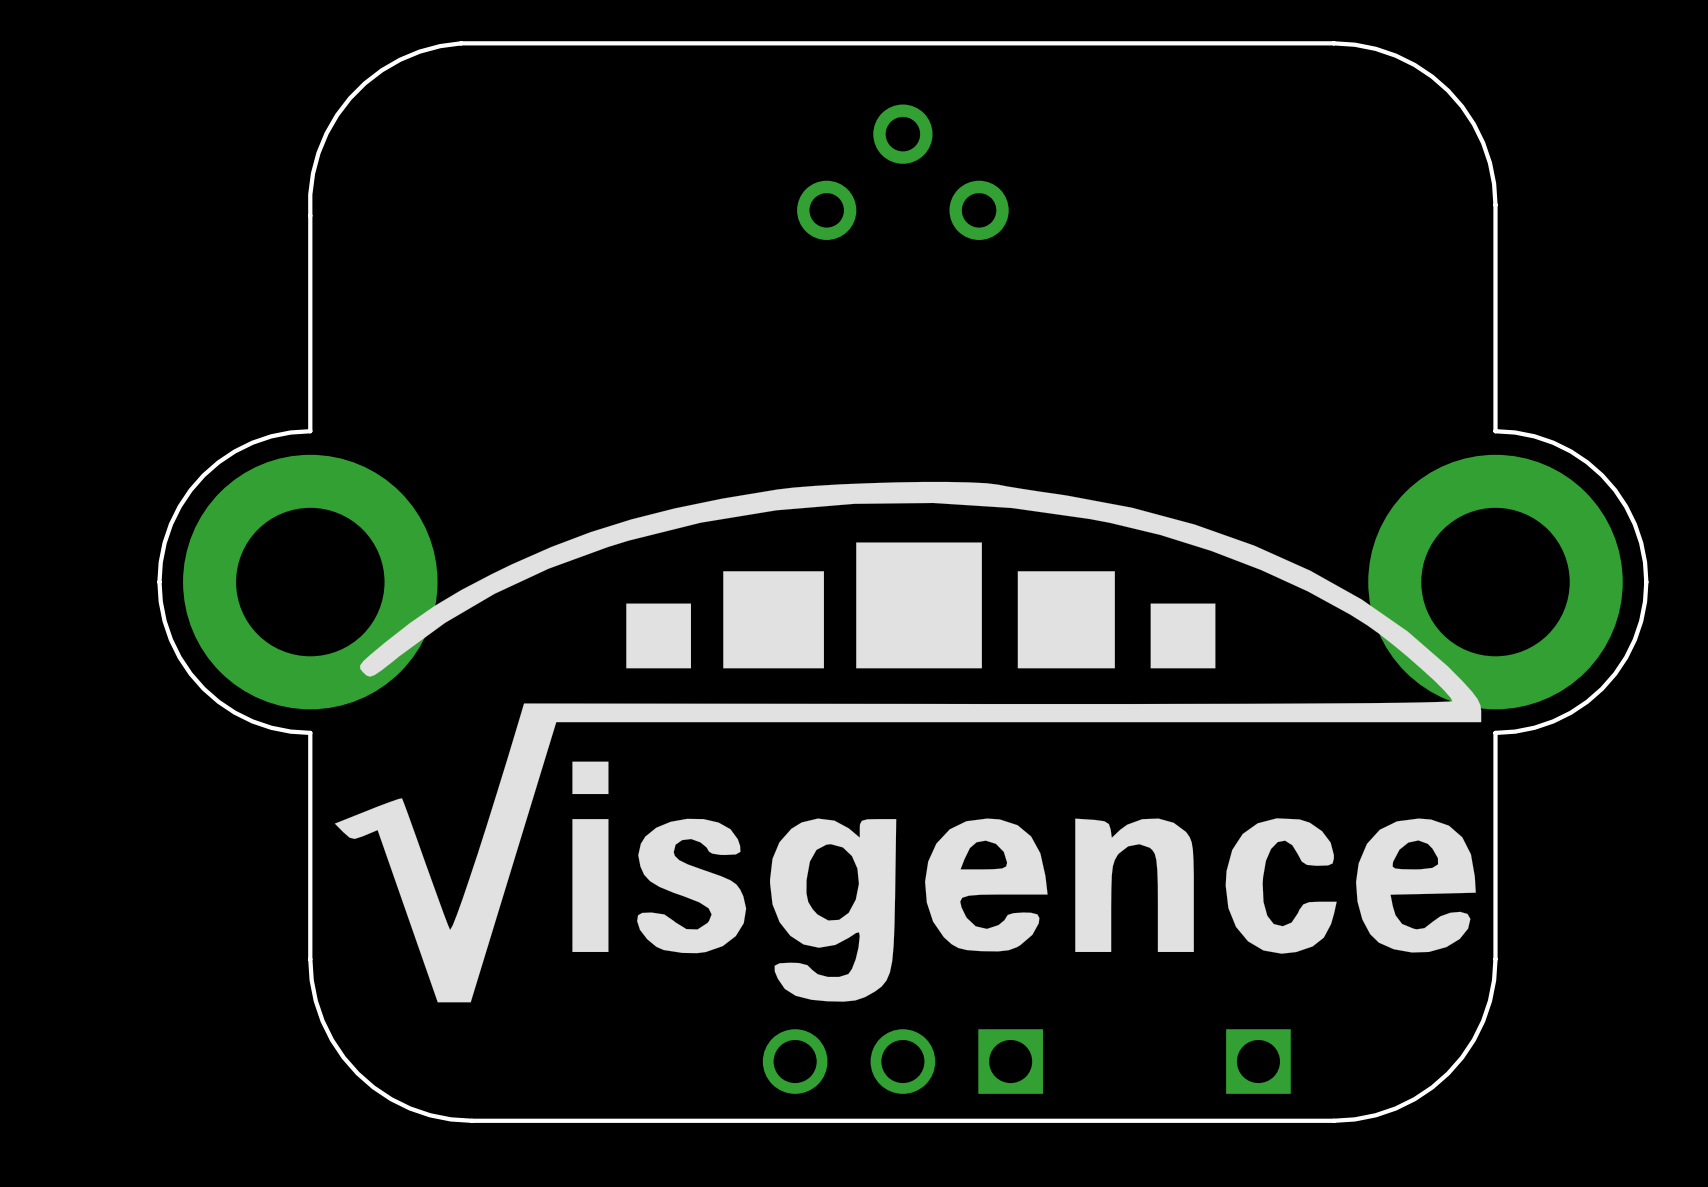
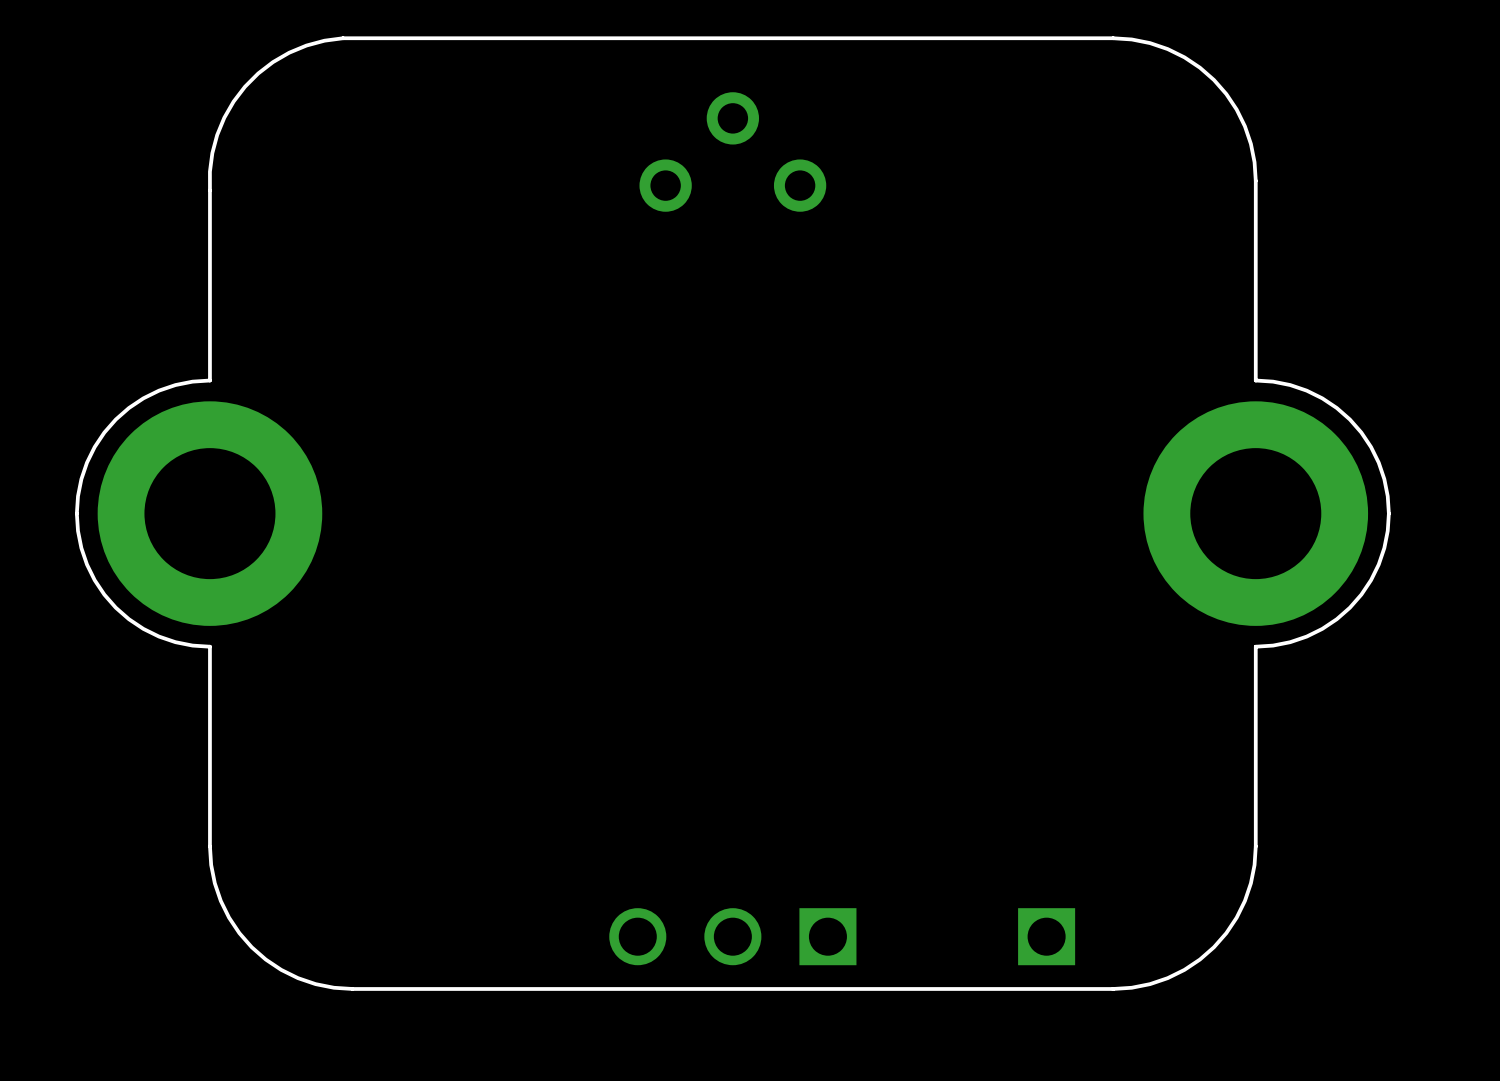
drawing: [334, 481, 1482, 1003] -> none

